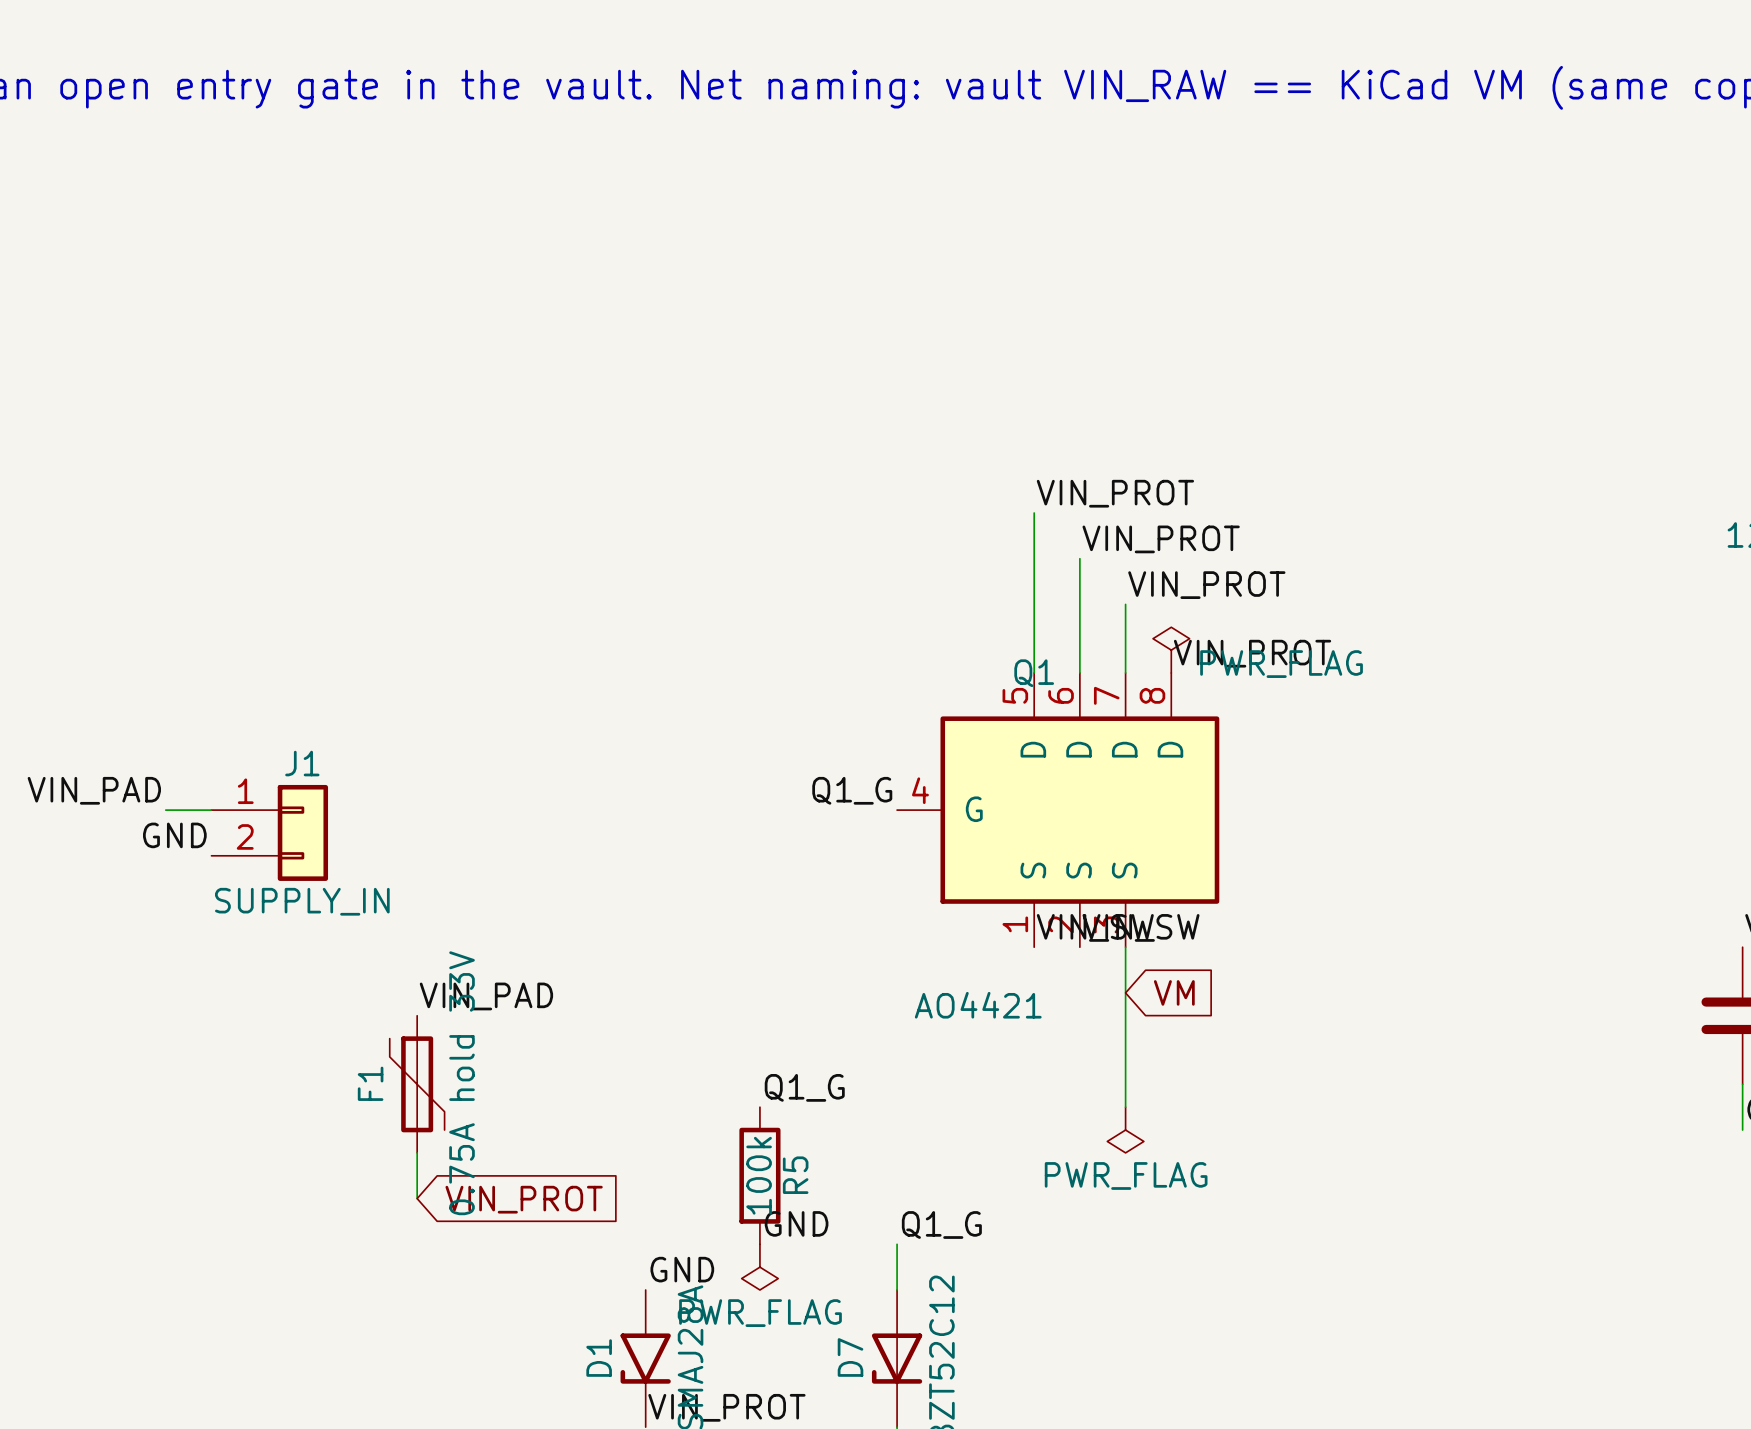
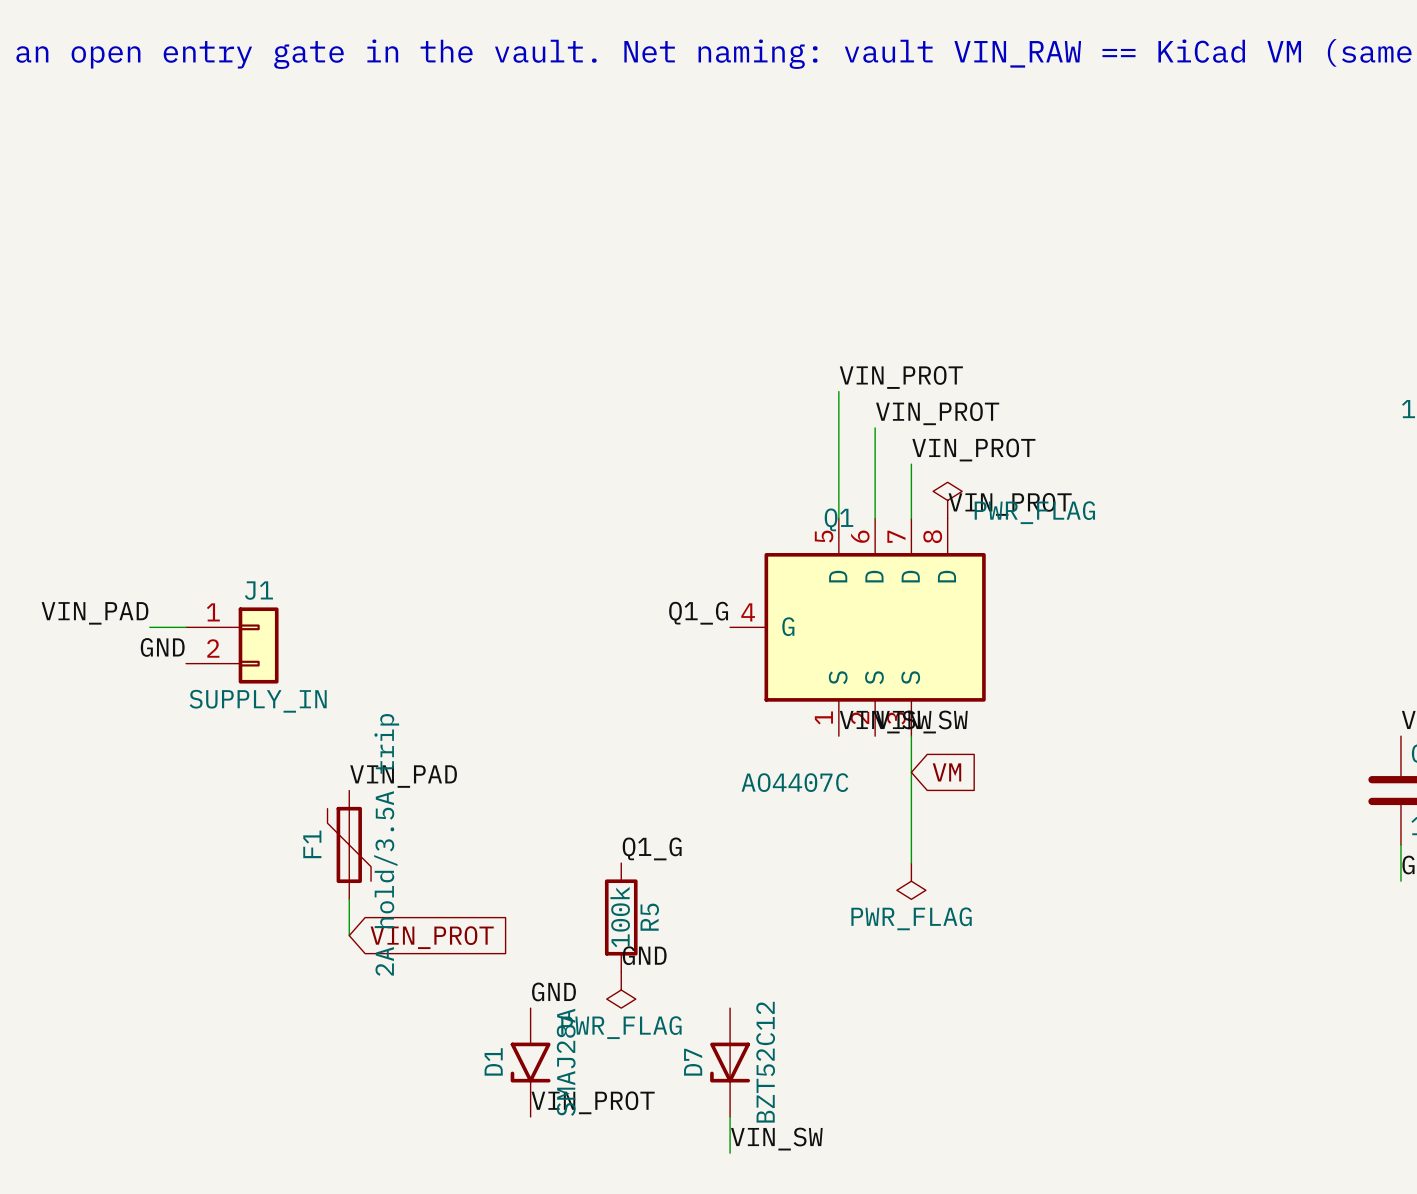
Q1 value: AO4421 (978, 1005) -> AO4407C (794, 782)
F1 value: 0.75A hold 33V (462, 1083) -> 2A hold/3.5A trip (386, 844)
label: Q1_G (941, 1225) -> none
wire: (897, 1244) (897, 1290) -> none

